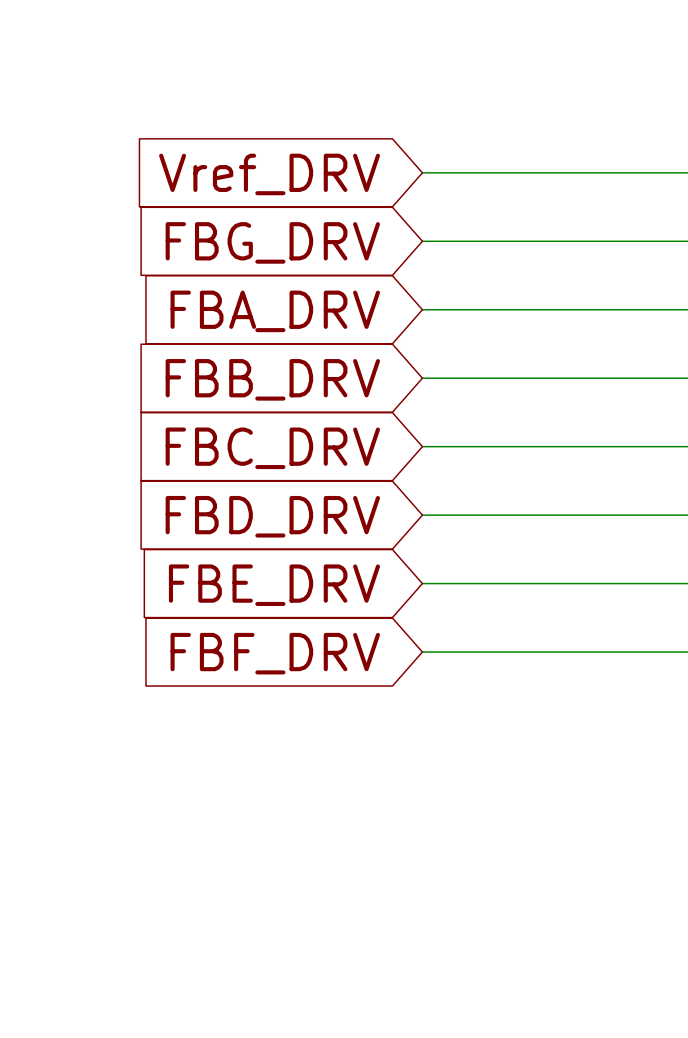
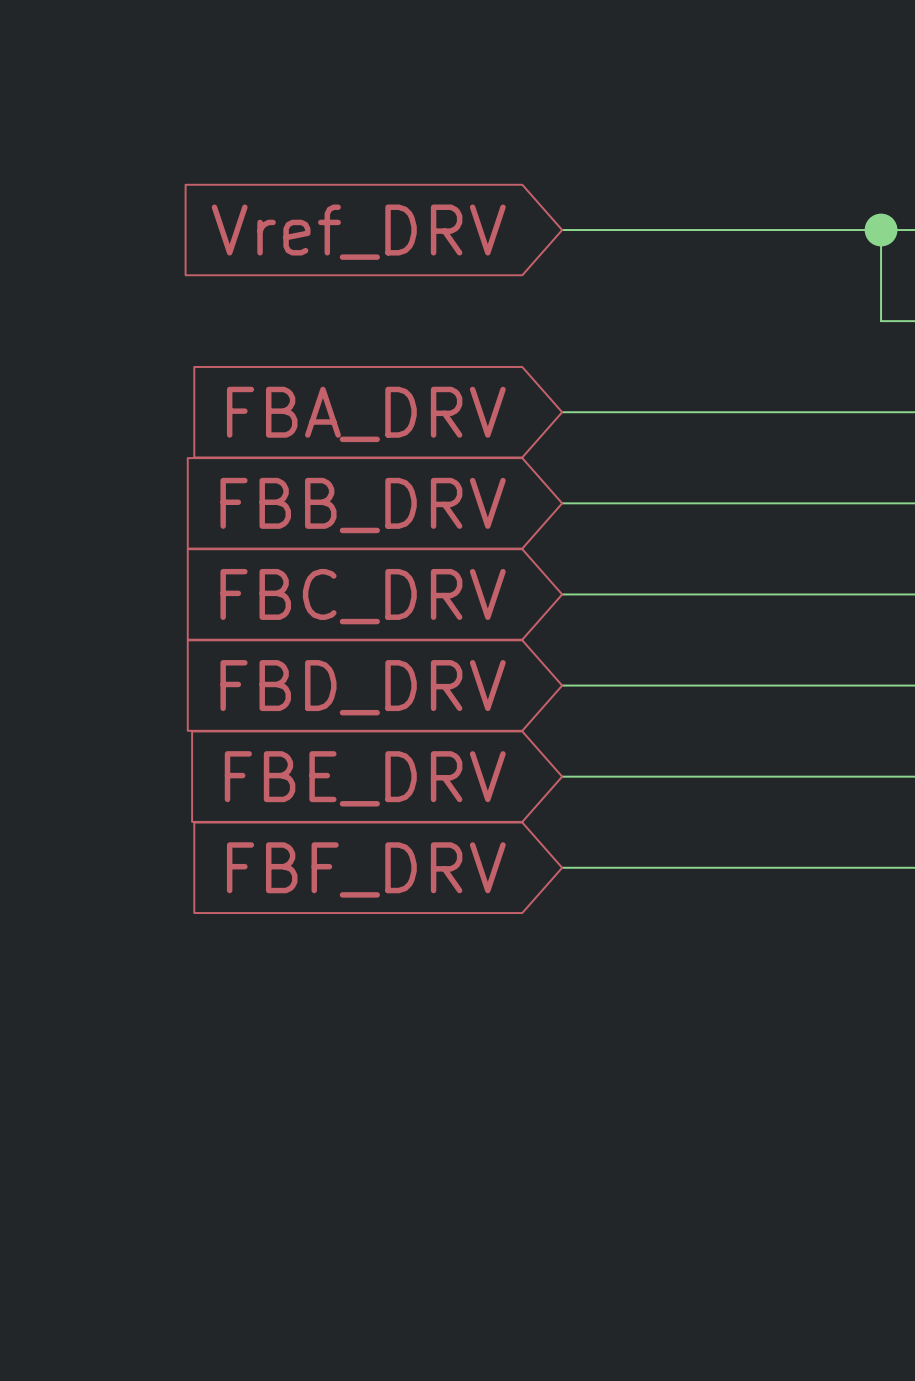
junction: none -> (881, 230)
wire: (422, 241) (662, 241) -> (881, 230) (881, 321)
global label: FBG_DRV (272, 242) -> none

